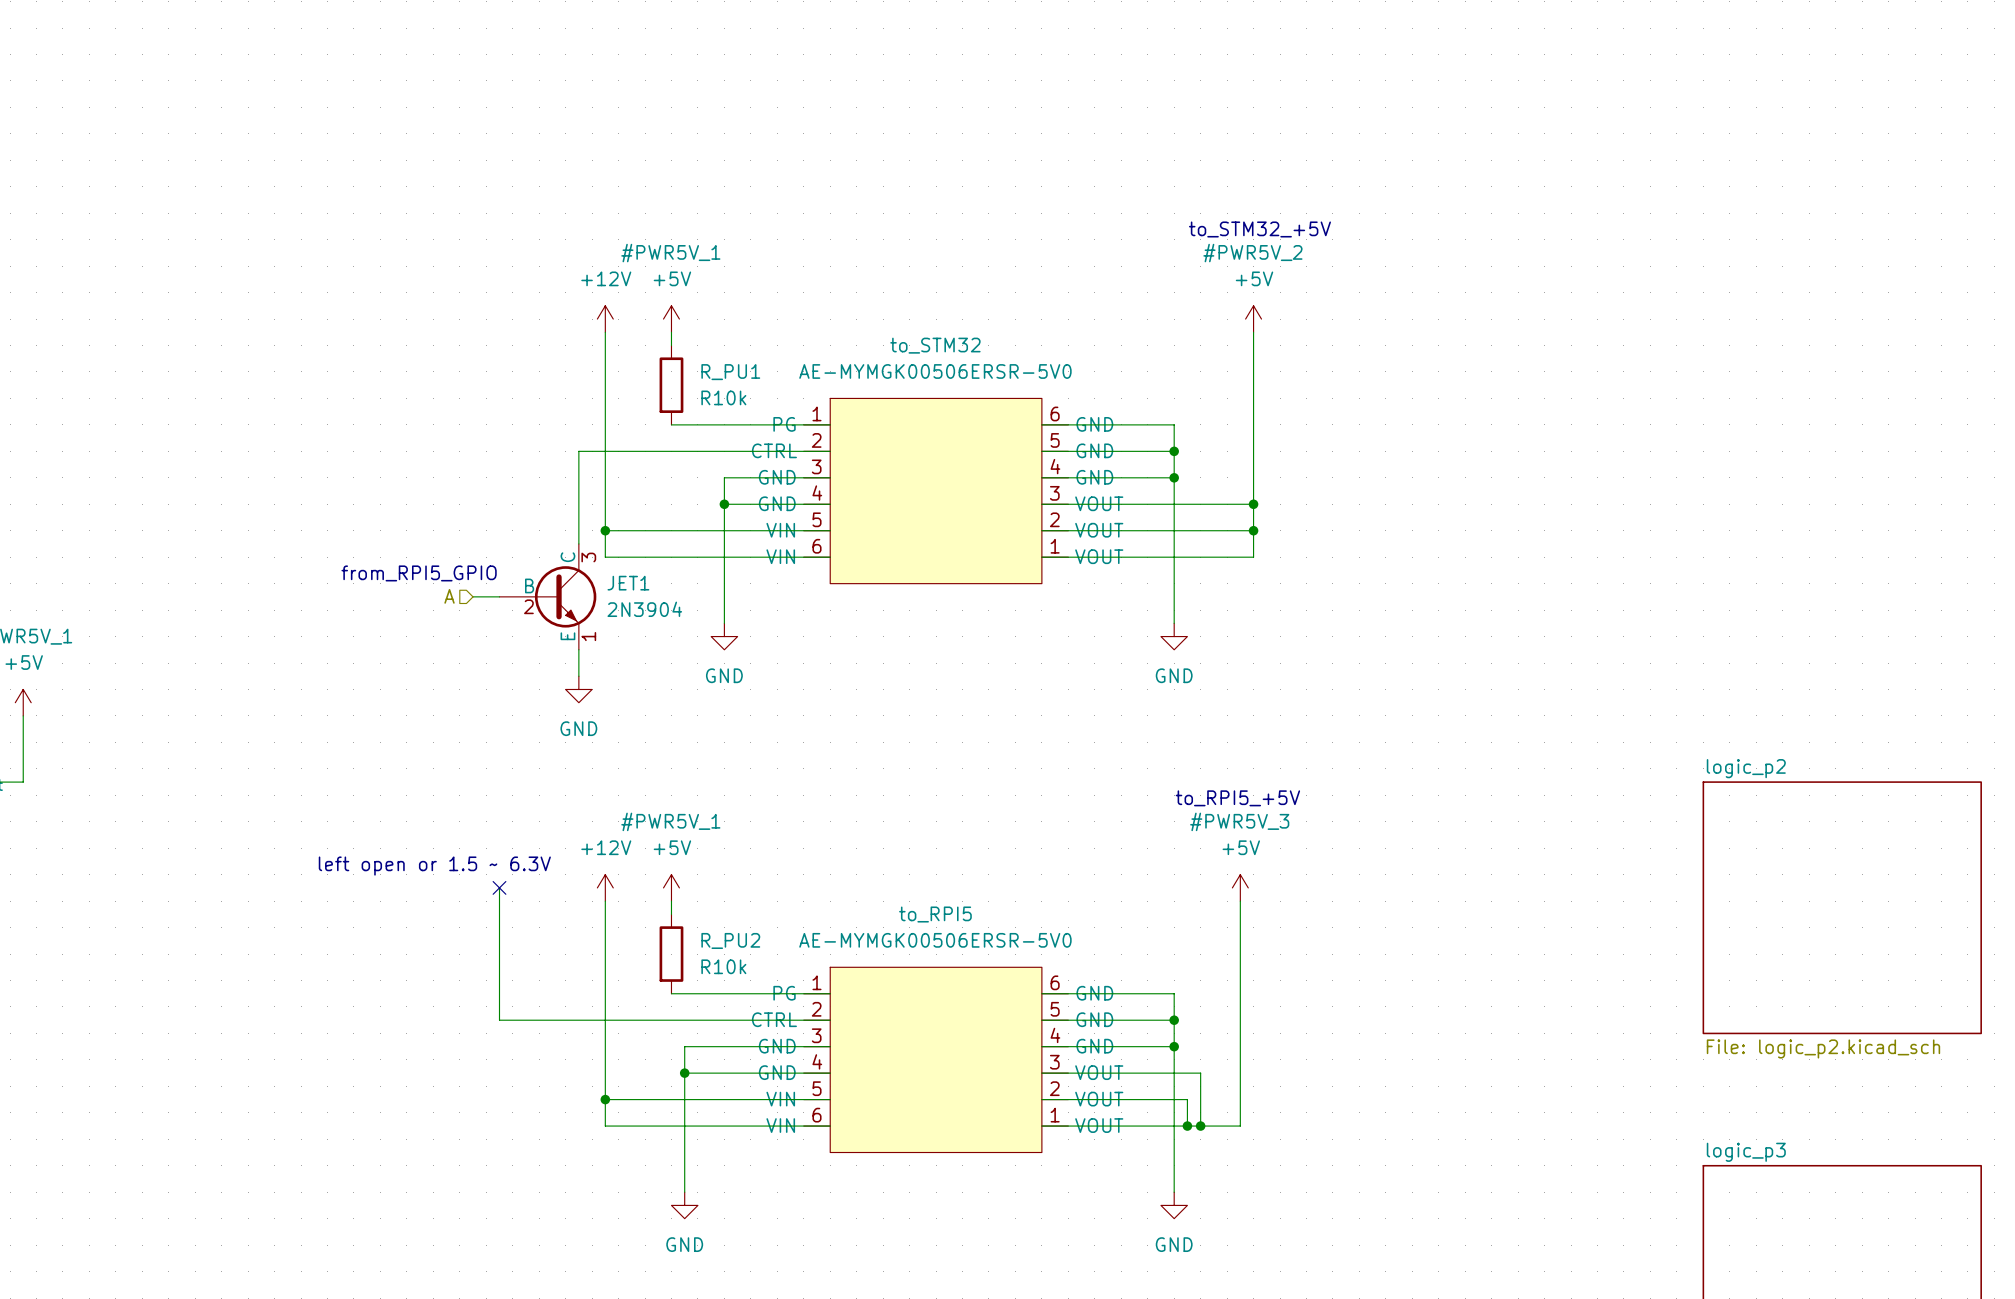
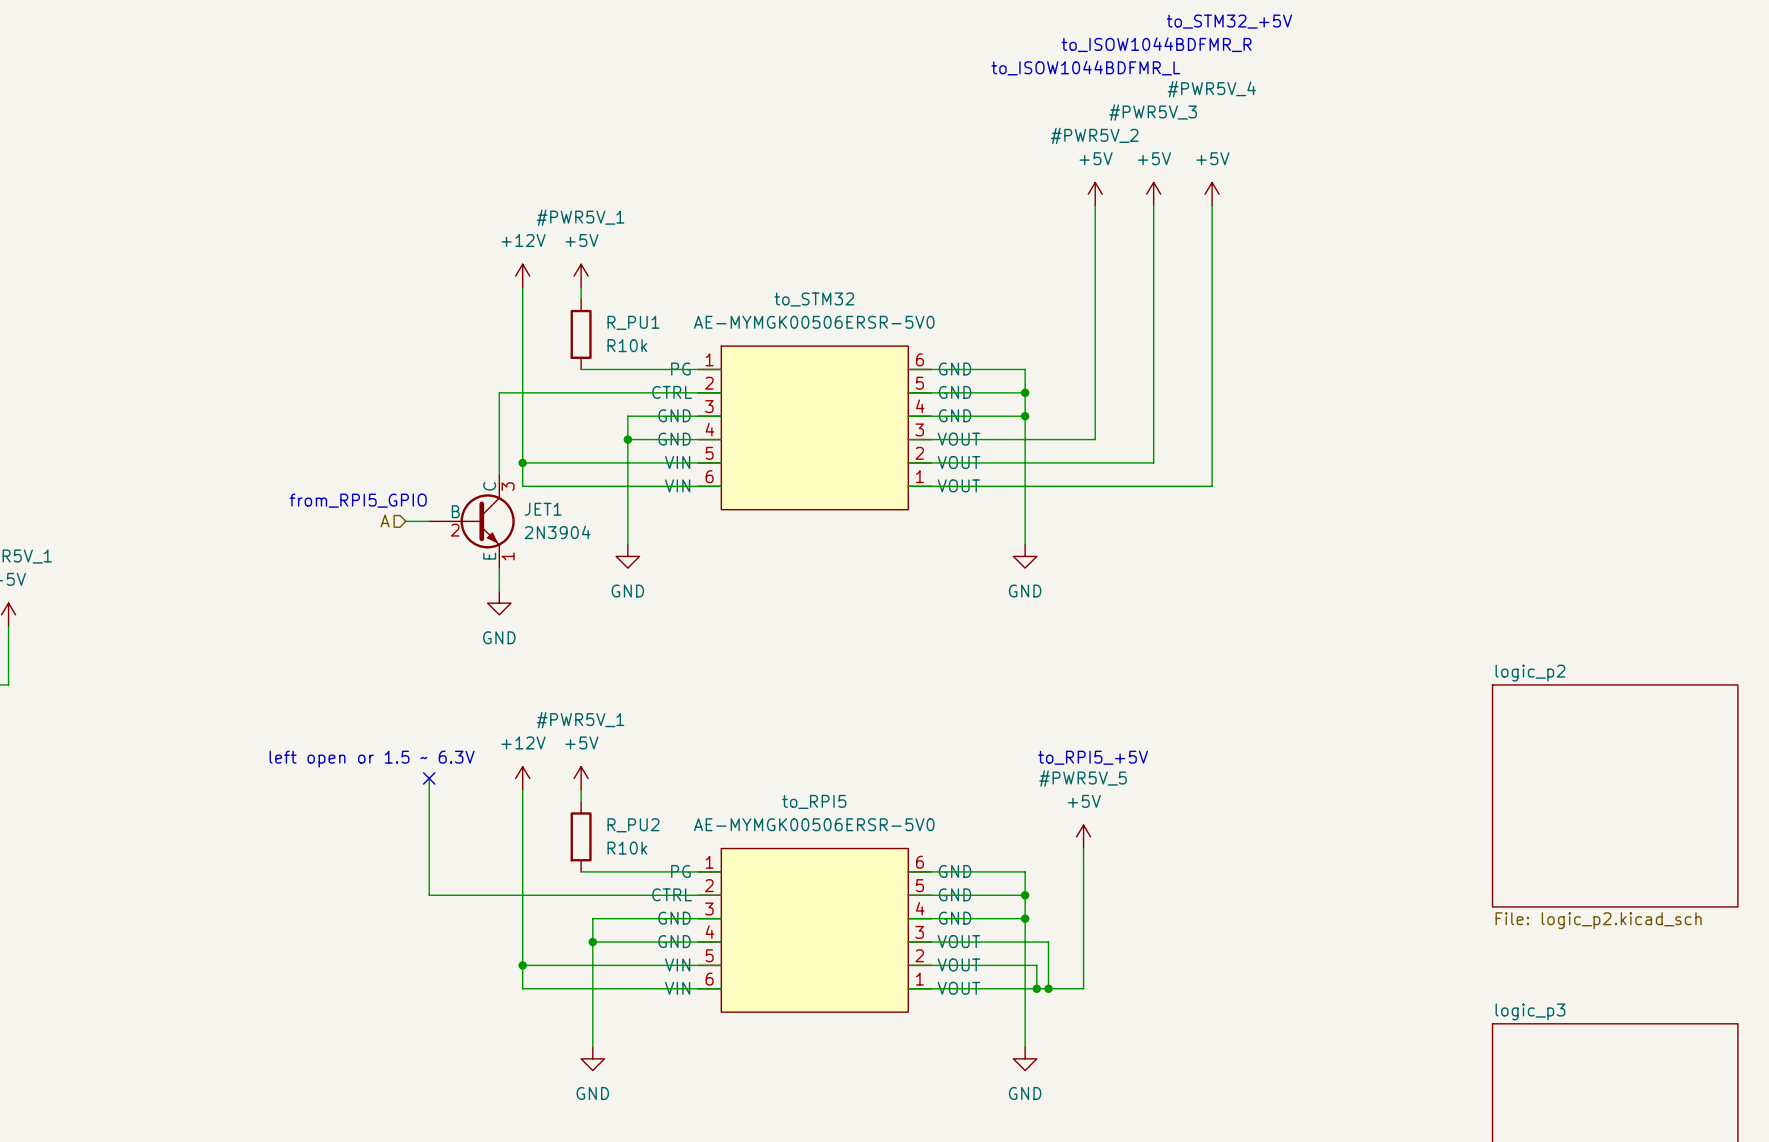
text: none -> to_ISOW1044BDFMR_R (1156, 44)
text: none -> to_ISOW1044BDFMR_L (1085, 68)
#PWR5V_4: none -> +5V (1212, 194)
text position: to_STM32_+5V (1259, 229) -> to_STM32_+5V (1229, 21)
wire: none -> (1095, 205) (1095, 287)
wire: none -> (1153, 205) (1153, 462) (1095, 462)
#PWR5V_2 position: +5V (1253, 319) -> +5V (1095, 194)
wire: (1253, 504) (1253, 557) -> (1212, 205) (1212, 486) (1095, 486)
junction: (1253, 504) -> none
junction: (1253, 530) -> none
text position: to_RPI5_+5V (1237, 798) -> to_RPI5_+5V (1093, 757)
#PWR5V_3 name position: #PWR5V_3 (1239, 821) -> #PWR5V_3 (1153, 112)
#PWR5V_3 position: +5V (1240, 887) -> +5V (1153, 194)
wire: (1240, 901) (1240, 967) -> none
#PWR5V_5: none -> +5V (1083, 836)

